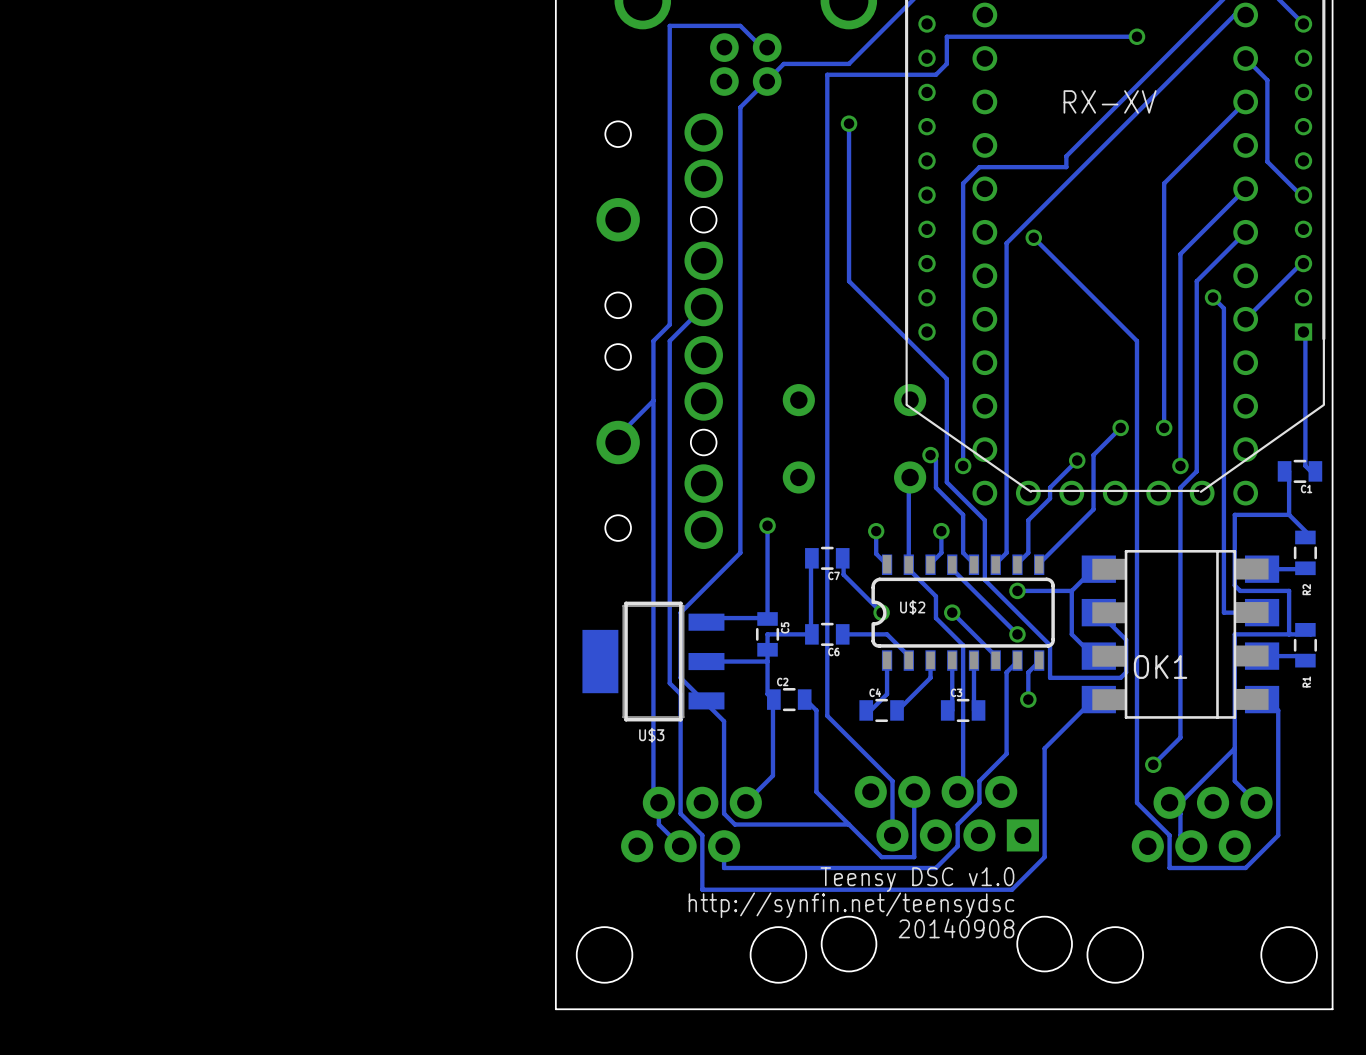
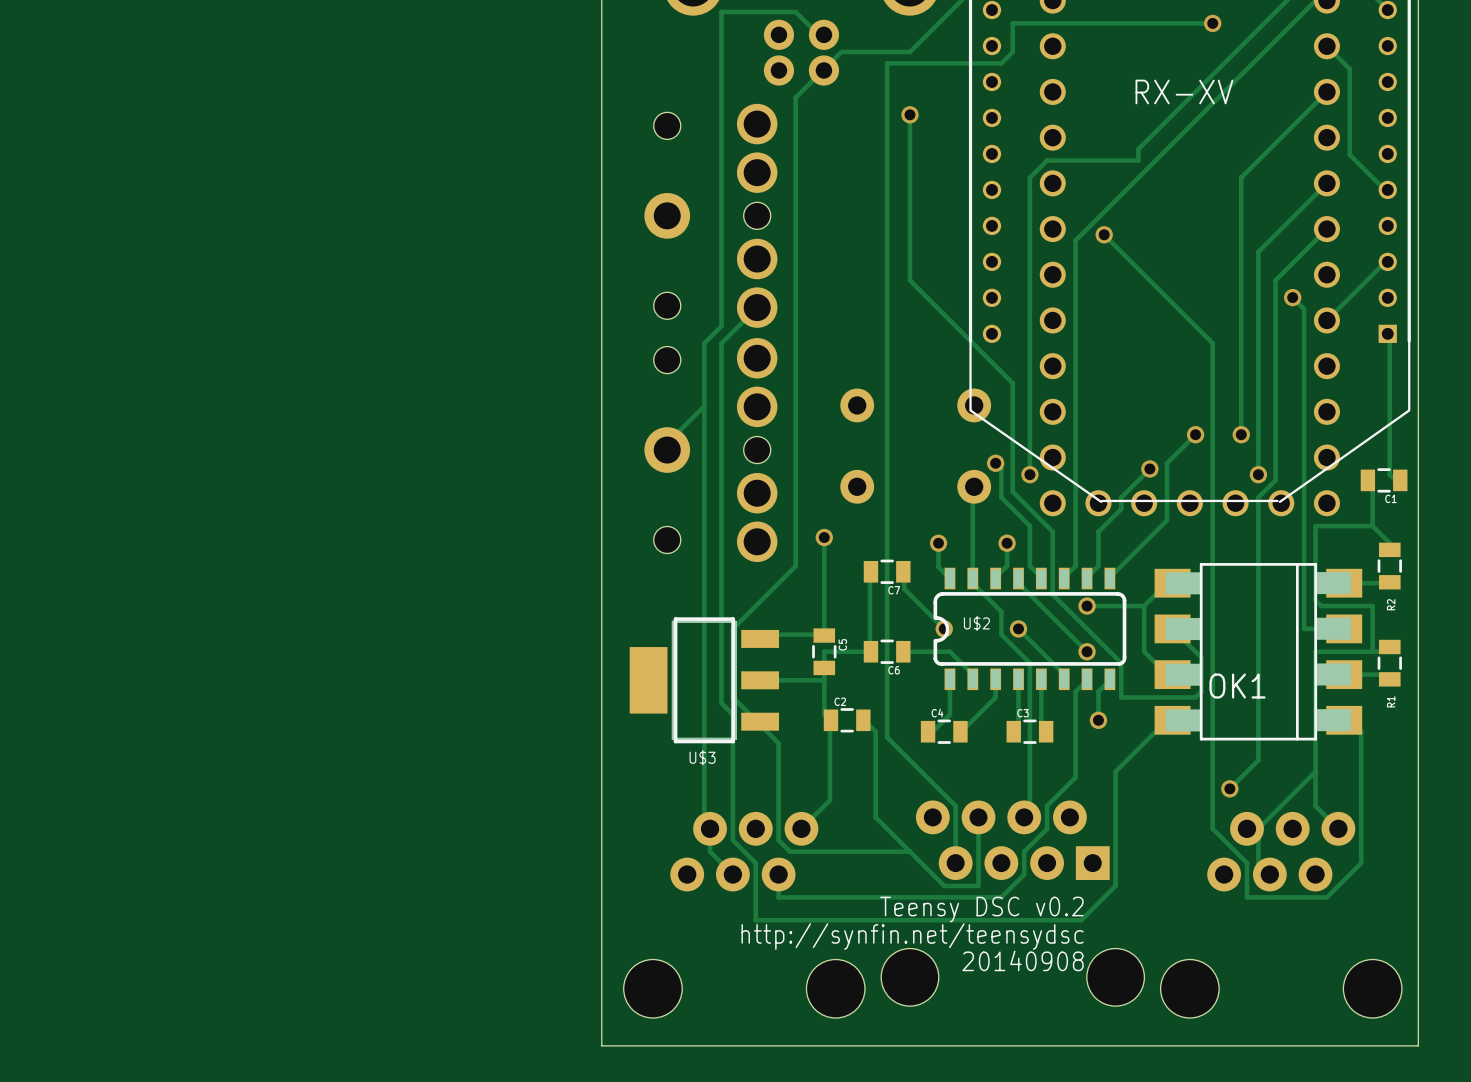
text: Teensy DSC v1.0 (917, 879) -> Teensy DSC v0.2 (981, 909)

